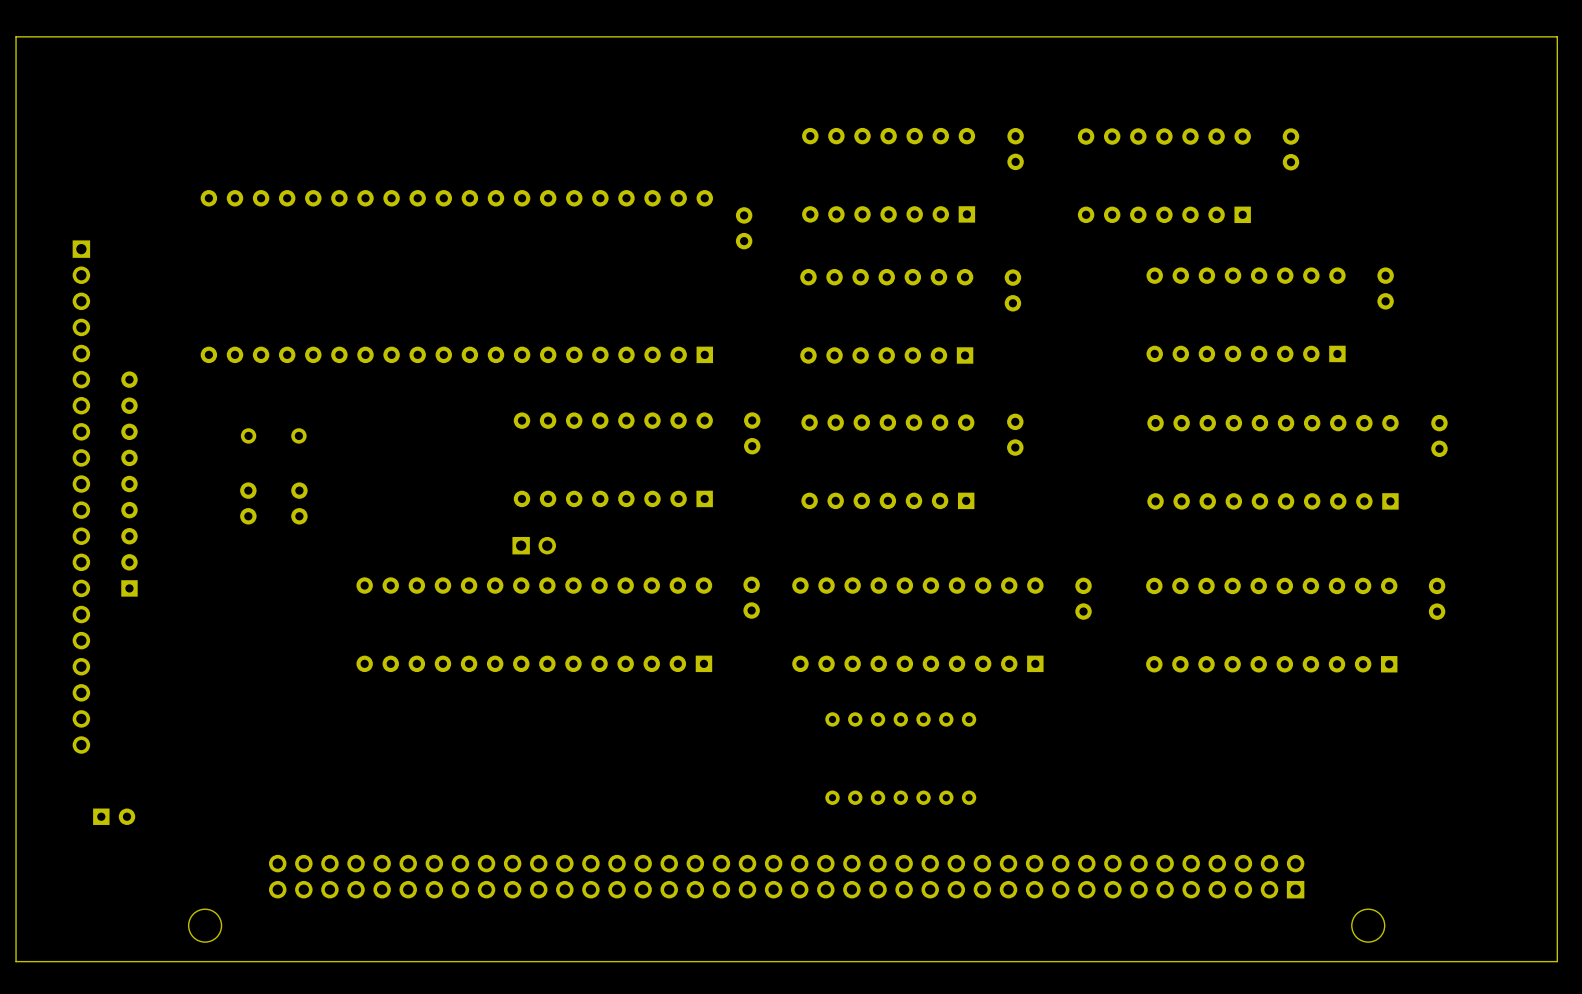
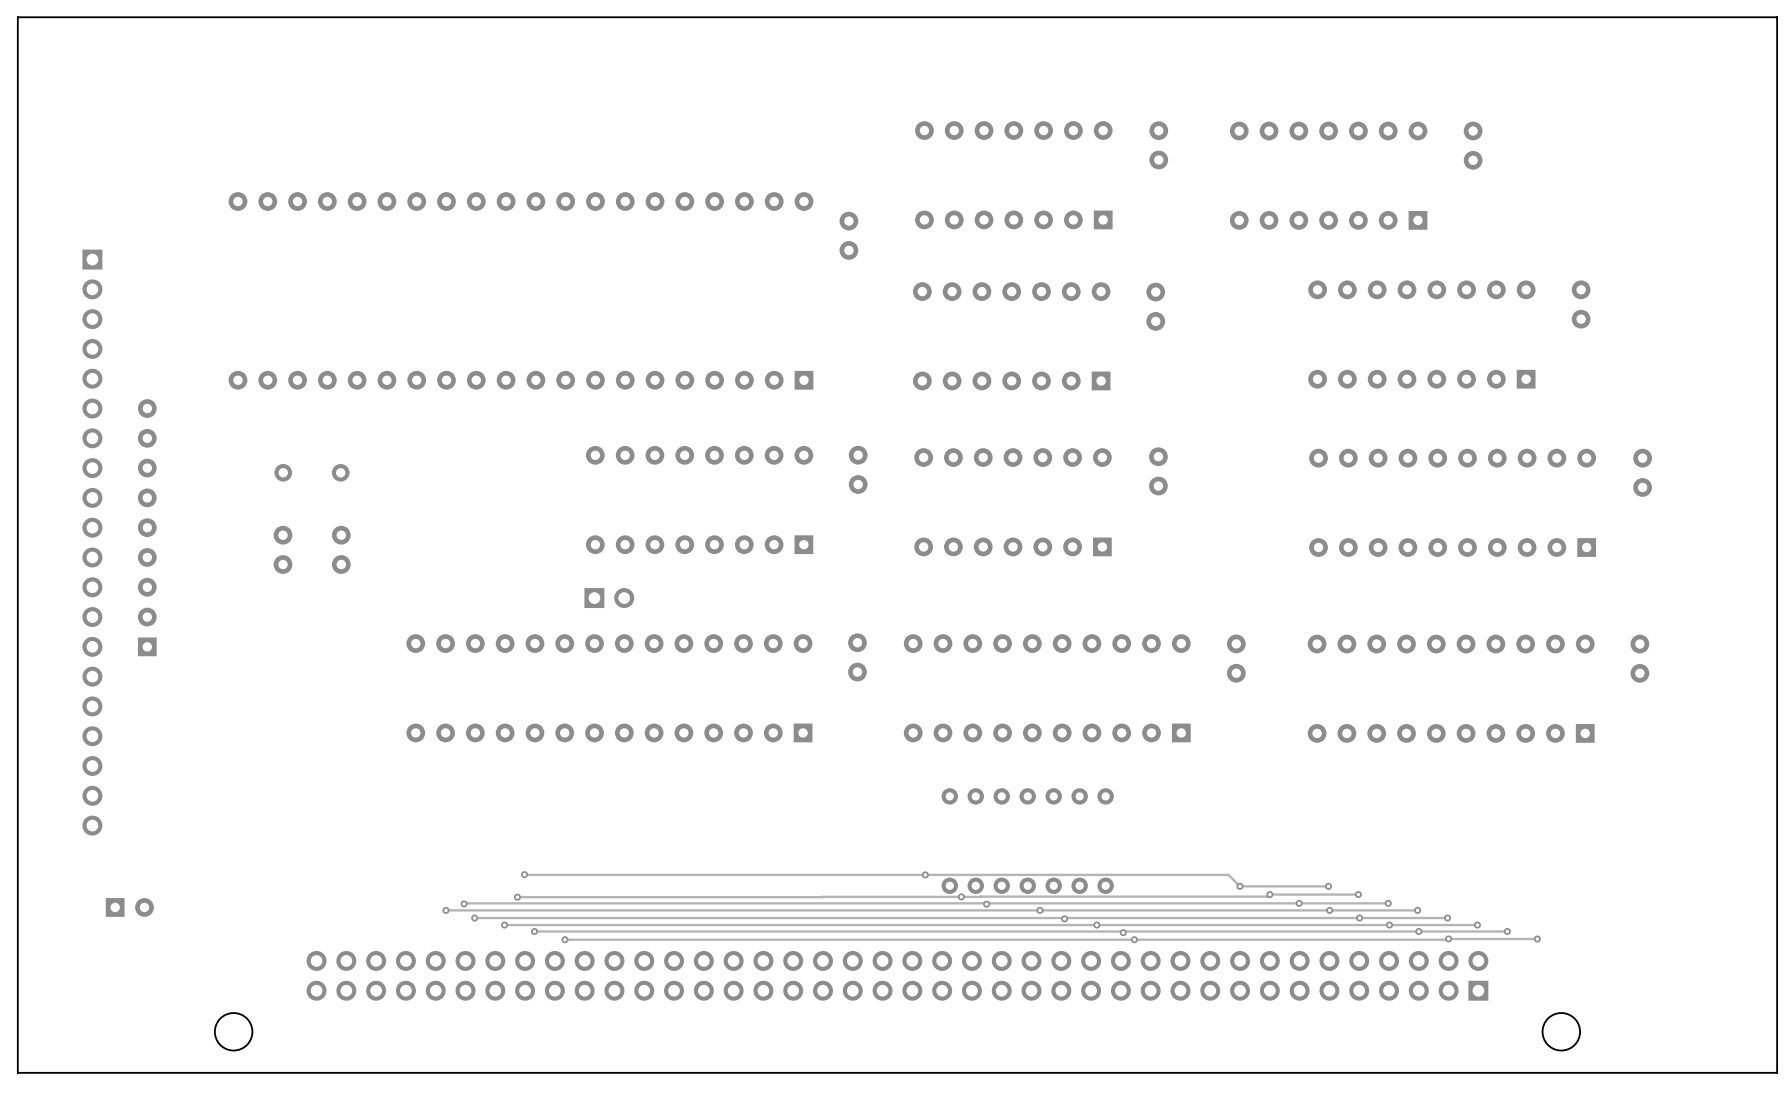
track: none -> (524, 874) (1228, 874) (1239, 886) (1328, 886)
via: none -> (524, 874)
via: none -> (925, 874)
via: none -> (1239, 886)
via: none -> (1328, 886)
via: none -> (1269, 894)
track: none -> (1358, 894) (1269, 894) (1267, 896) (517, 897)
via: none -> (1358, 894)
via: none -> (517, 897)
via: none -> (961, 896)
via: none -> (464, 903)
via: none -> (986, 904)
via: none -> (1299, 903)
track: none -> (1388, 903) (464, 903)
via: none -> (1388, 903)
via: none -> (445, 910)
via: none -> (1039, 910)
via: none -> (1329, 910)
track: none -> (1417, 910) (445, 910)
via: none -> (1417, 910)
via: none -> (474, 918)
via: none -> (1359, 918)
track: none -> (1447, 918) (474, 918)
via: none -> (1447, 918)
via: none -> (1064, 918)
via: none -> (504, 925)
via: none -> (1096, 925)
via: none -> (1389, 925)
track: none -> (1477, 925) (504, 925)
via: none -> (1477, 925)
via: none -> (534, 931)
via: none -> (1418, 931)
track: none -> (1507, 931) (534, 931)
via: none -> (1507, 931)
via: none -> (1123, 932)
via: none -> (564, 939)
via: none -> (1134, 939)
track: none -> (1448, 938) (564, 939)
via: none -> (1448, 938)
track: none -> (1537, 939) (1448, 939)
via: none -> (1537, 939)

